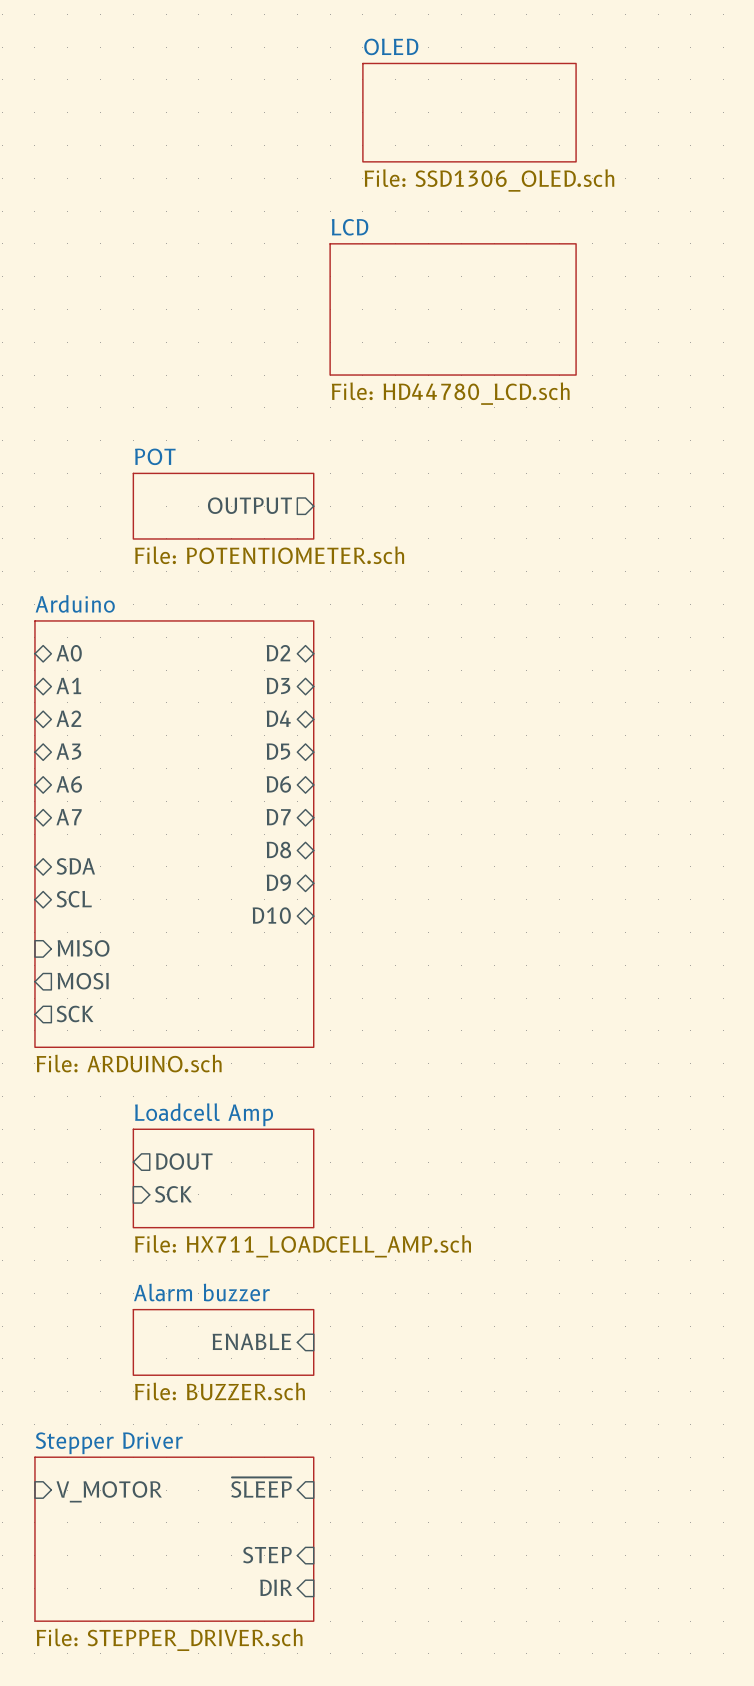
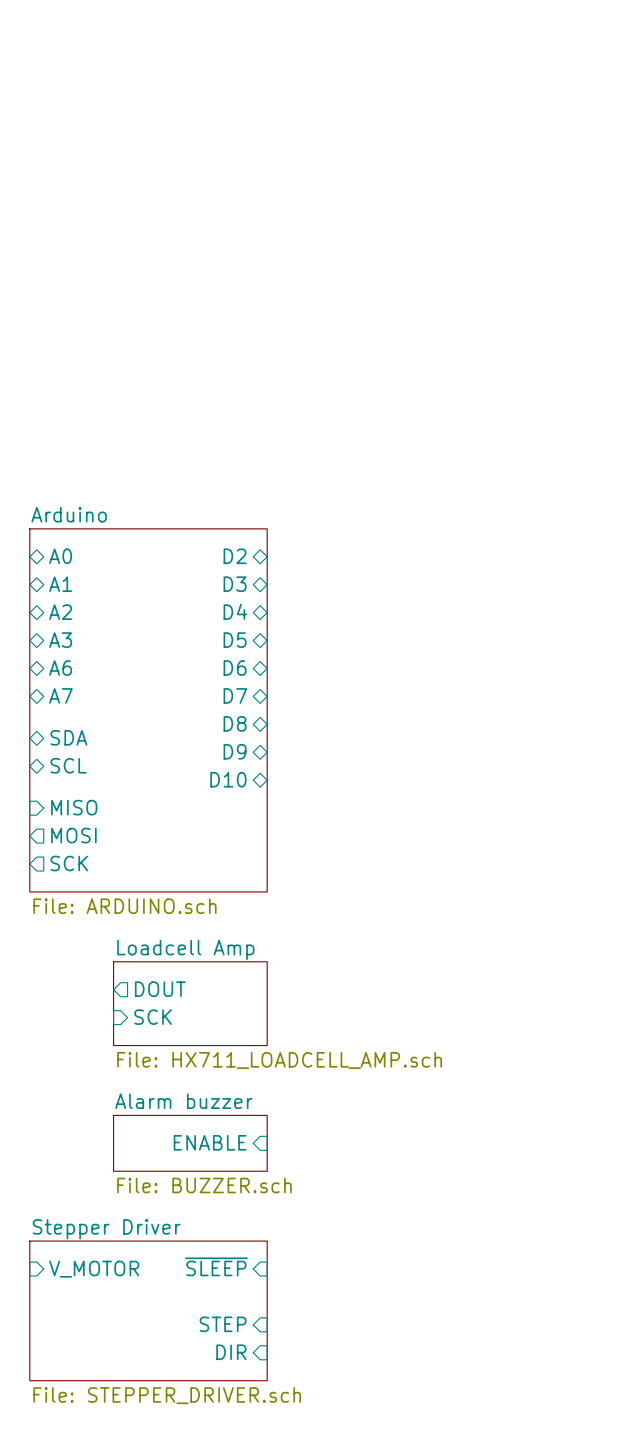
sheet OLED: File: SSD1306_OLED.sch (469, 112) -> none
sheet LCD: File: HD44780_LCD.sch (453, 309) -> none
sheet pin: OUTPUT (249, 505) -> none
sheet POT: File: POTENTIOMETER.sch (223, 506) -> none

